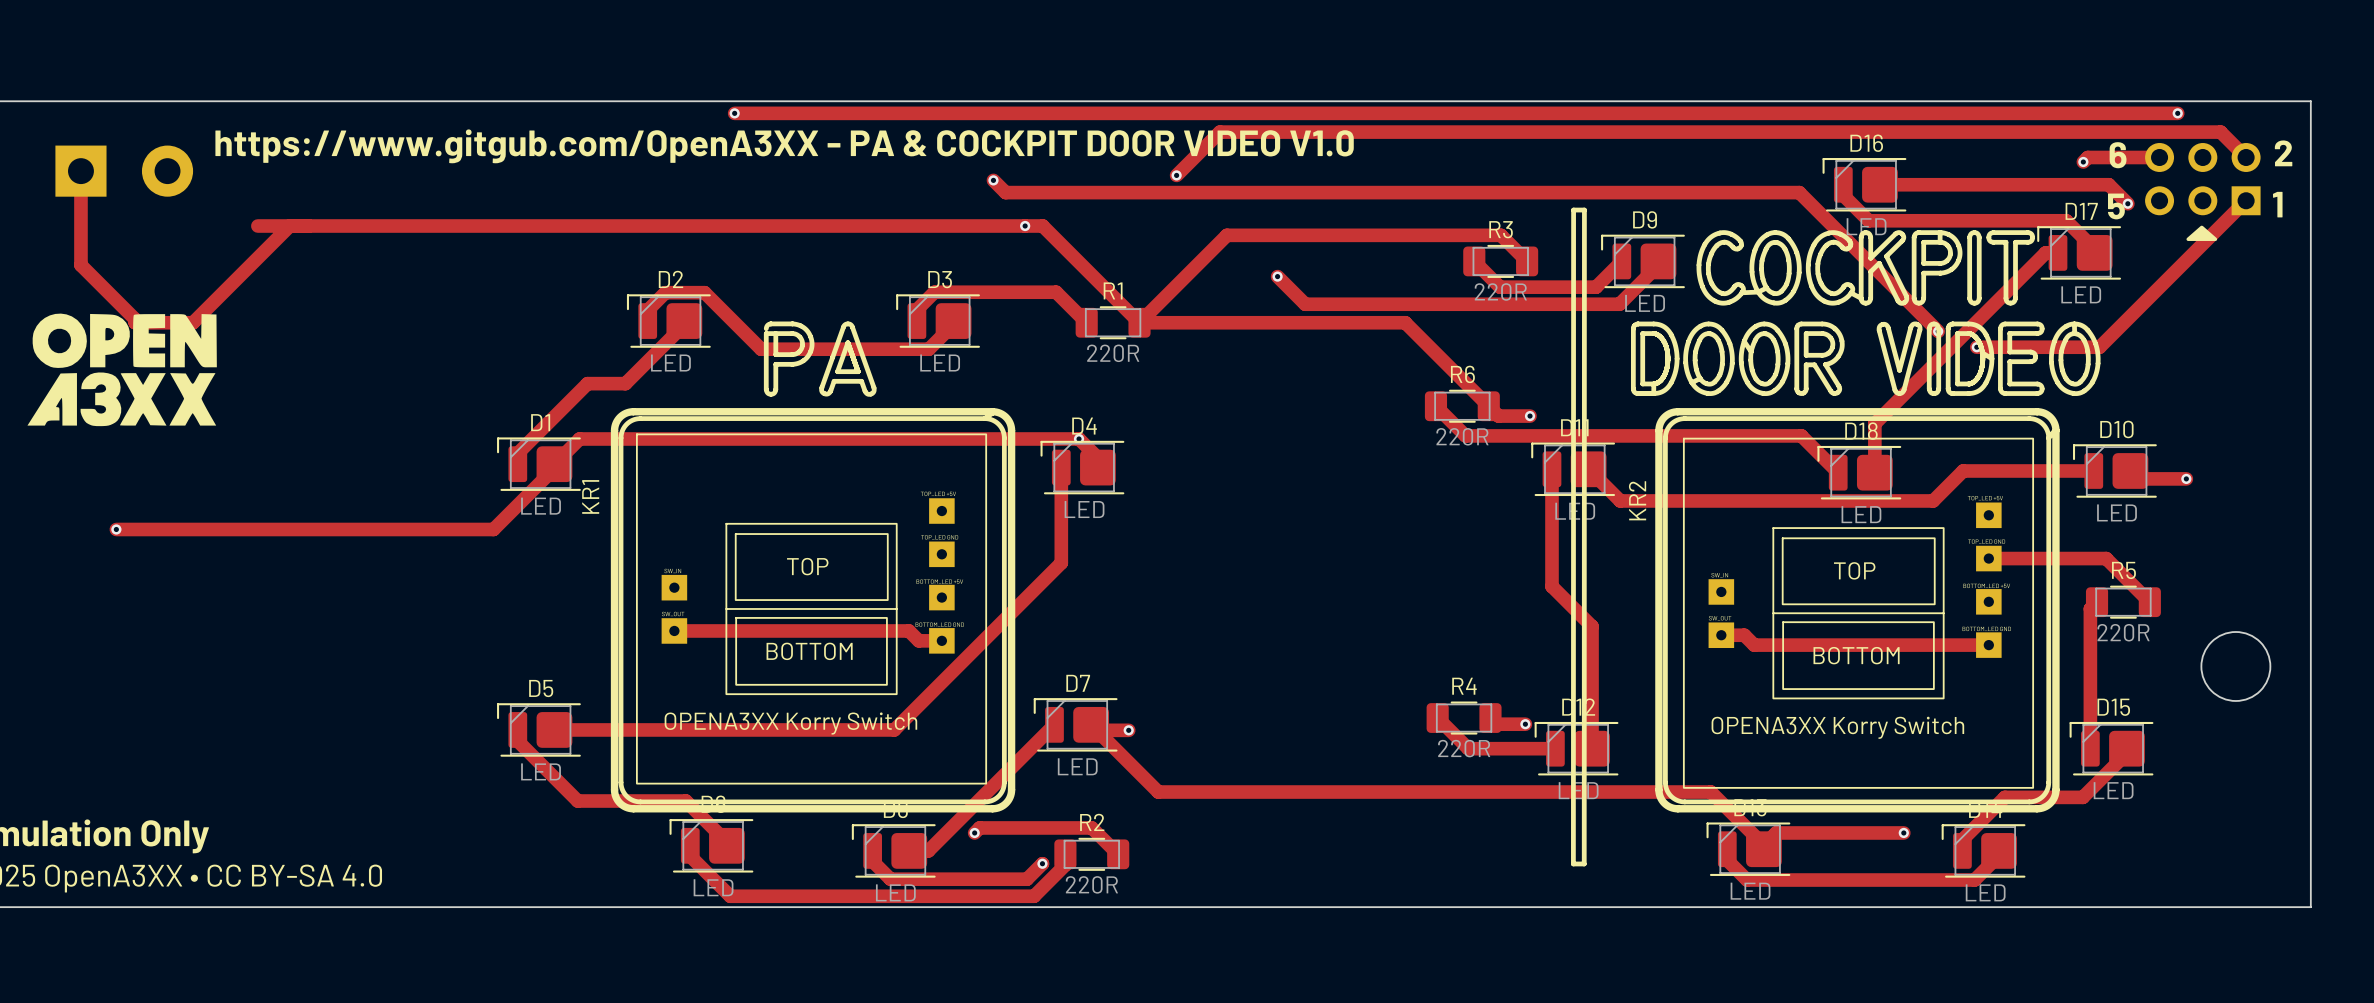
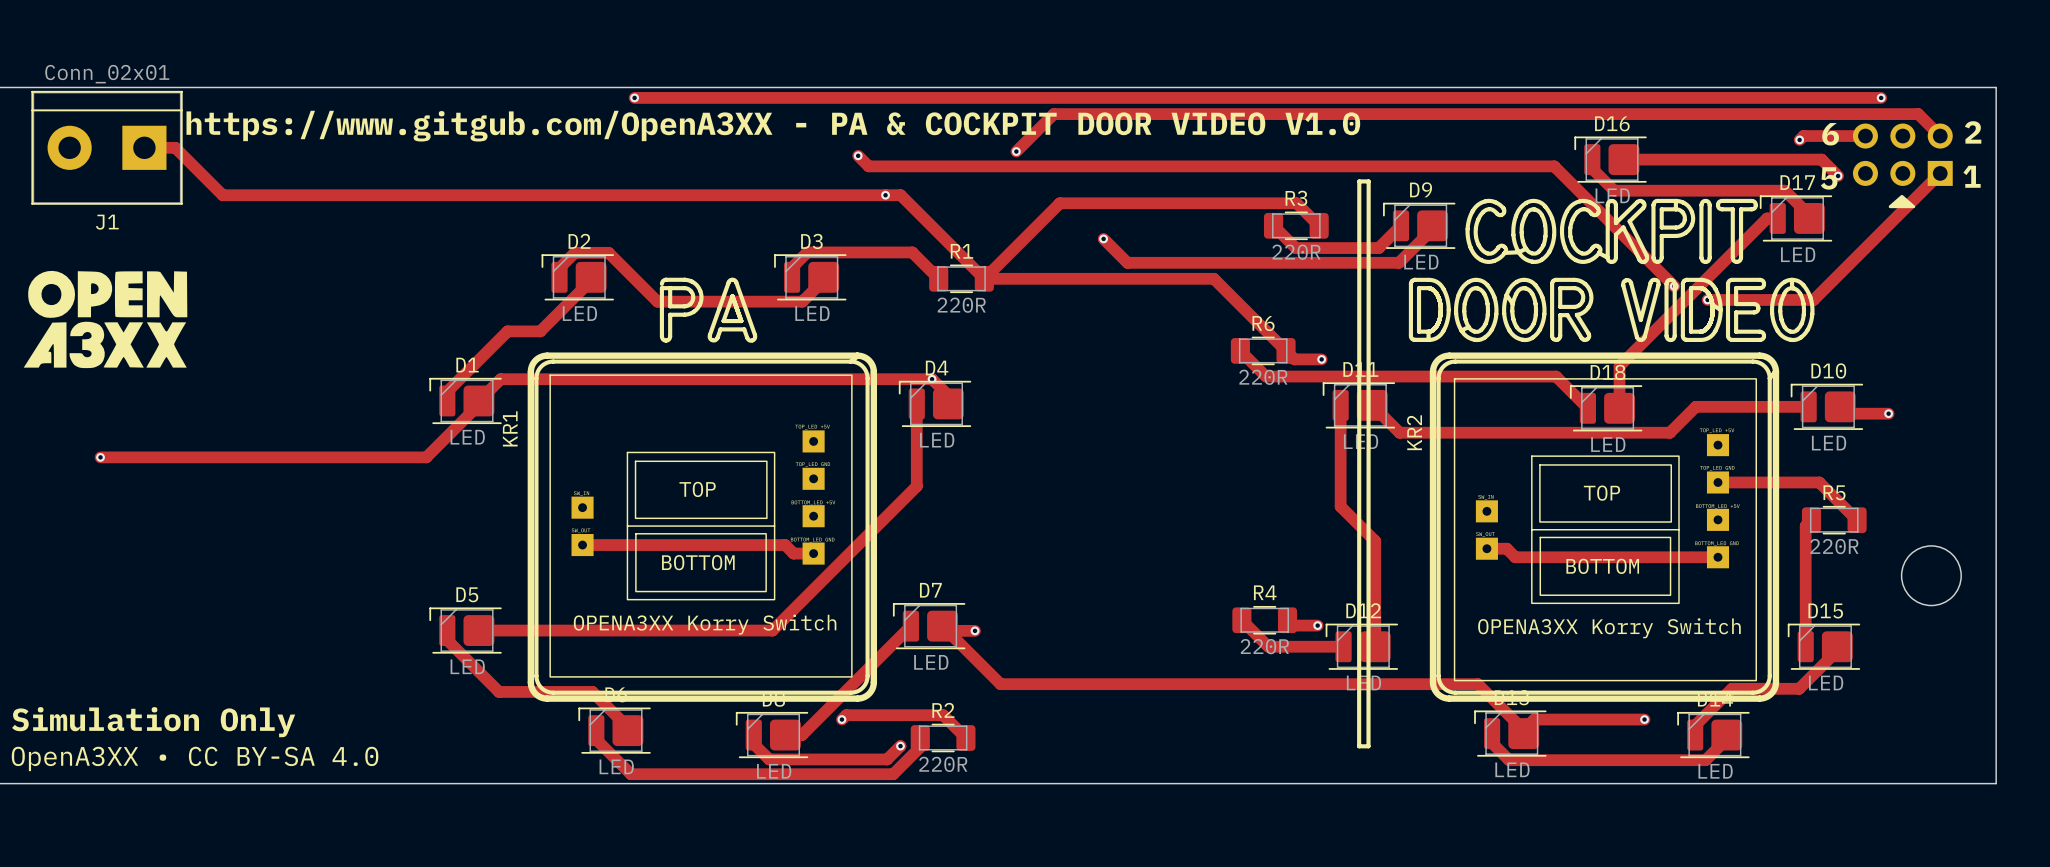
track: (80, 171) (80, 265) (135, 319) (135, 322) (193, 322) (289, 226) -> none
J1 side: bottom (124, 171) -> top (107, 147)
track: none -> (144, 147) (175, 147) (222, 195)

